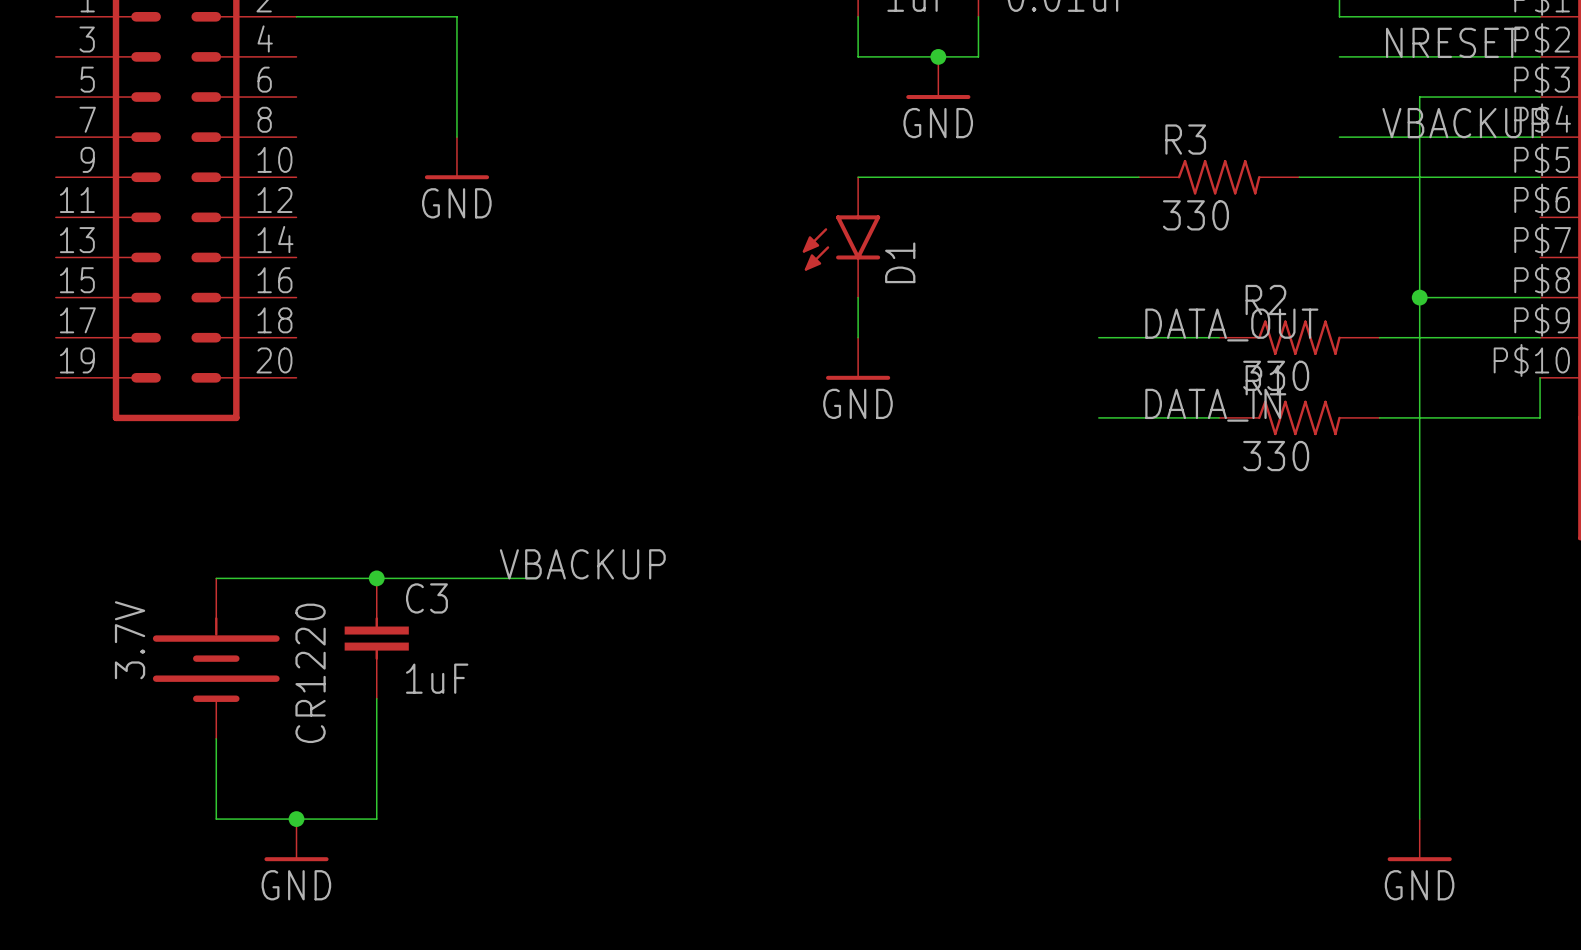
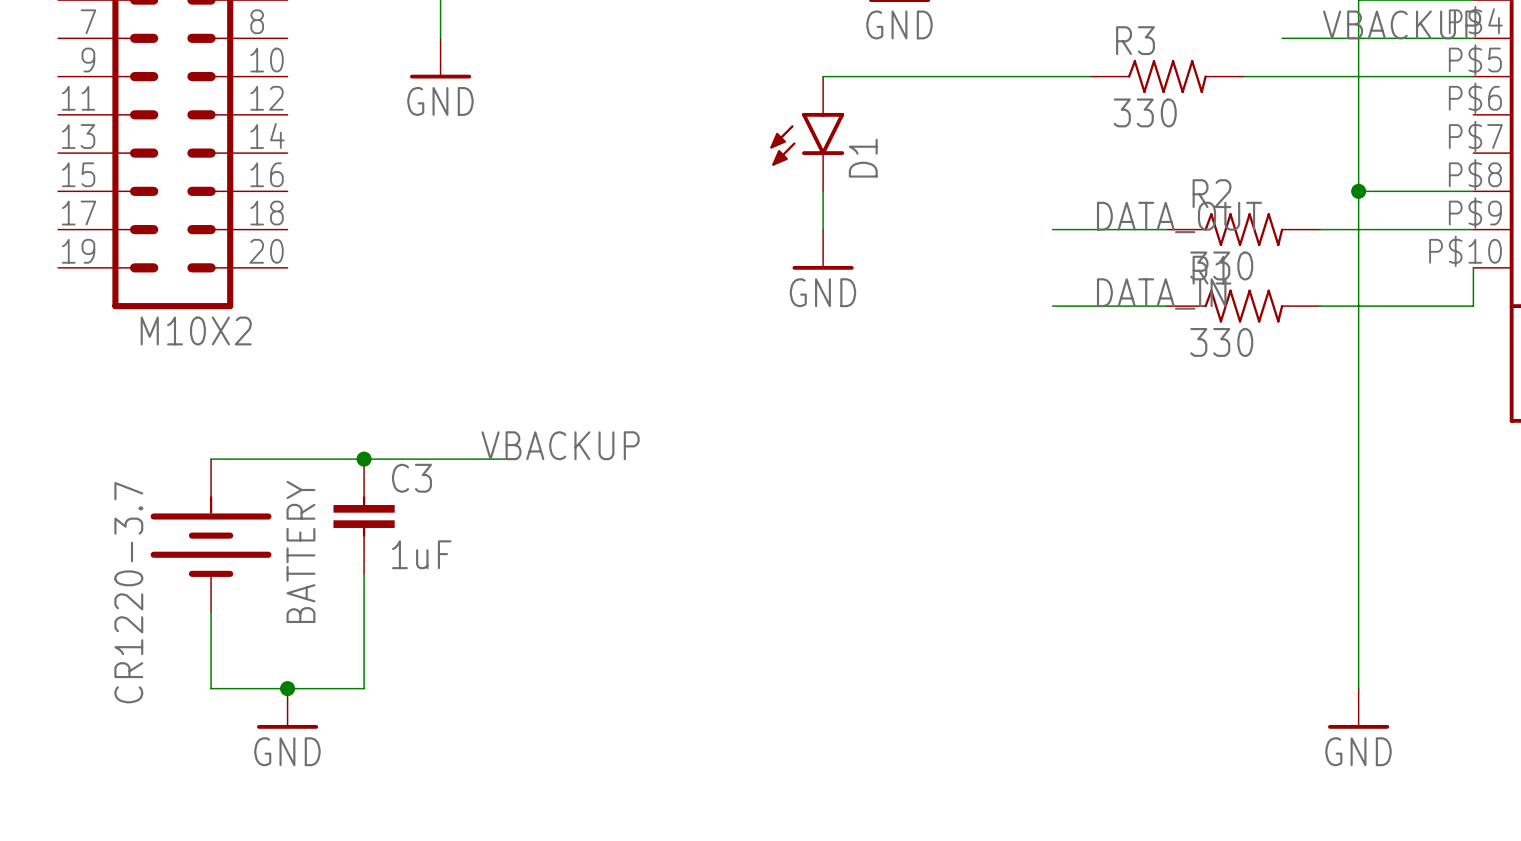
part value: none -> M10X2 (196, 330)
CR1220 value: 3.7V (130, 640) -> CR1220-3.7 (128, 592)
CR1220 name: CR1220 (310, 673) -> BATTERY (300, 551)

